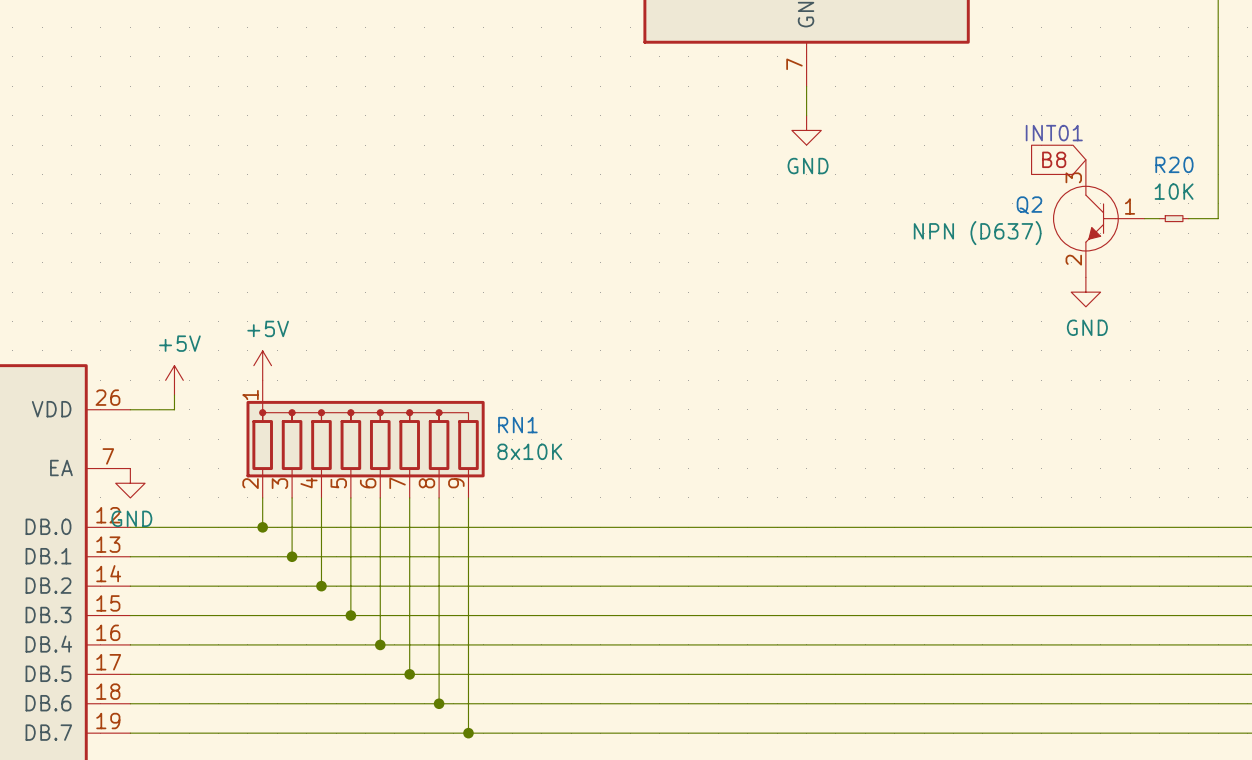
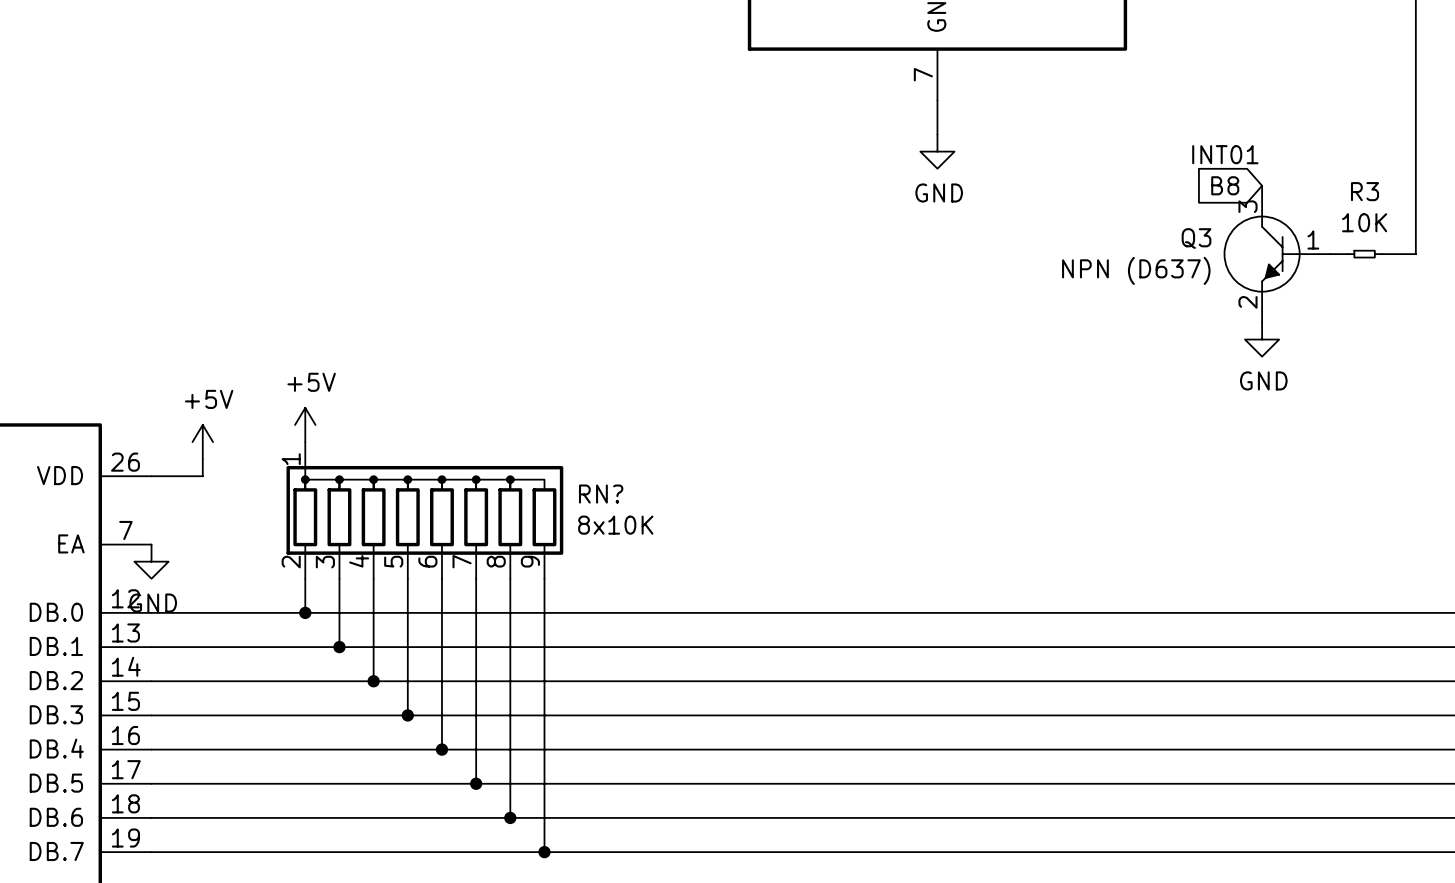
R20 name: R20 (1174, 164) -> R3 (1365, 191)
Q2 name: Q2 (1029, 205) -> Q3 (1196, 238)
RN1 name: RN1 (517, 425) -> RN? (601, 494)

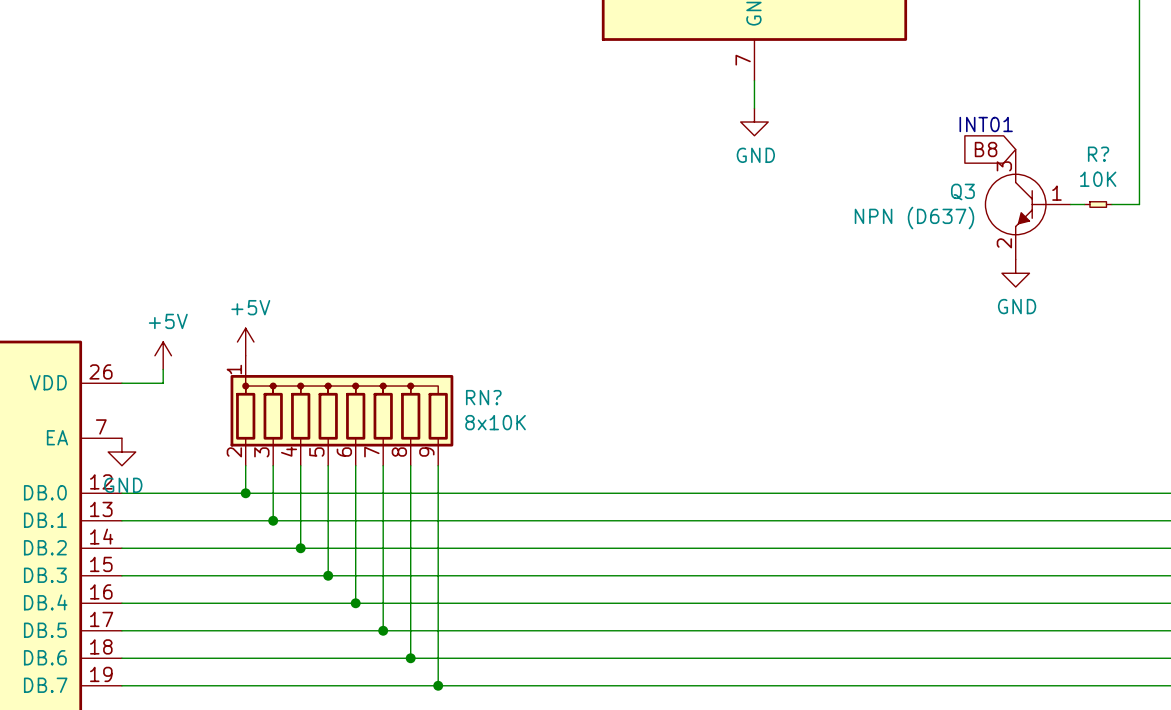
R3 name: R3 (1365, 191) -> R? (1098, 154)

